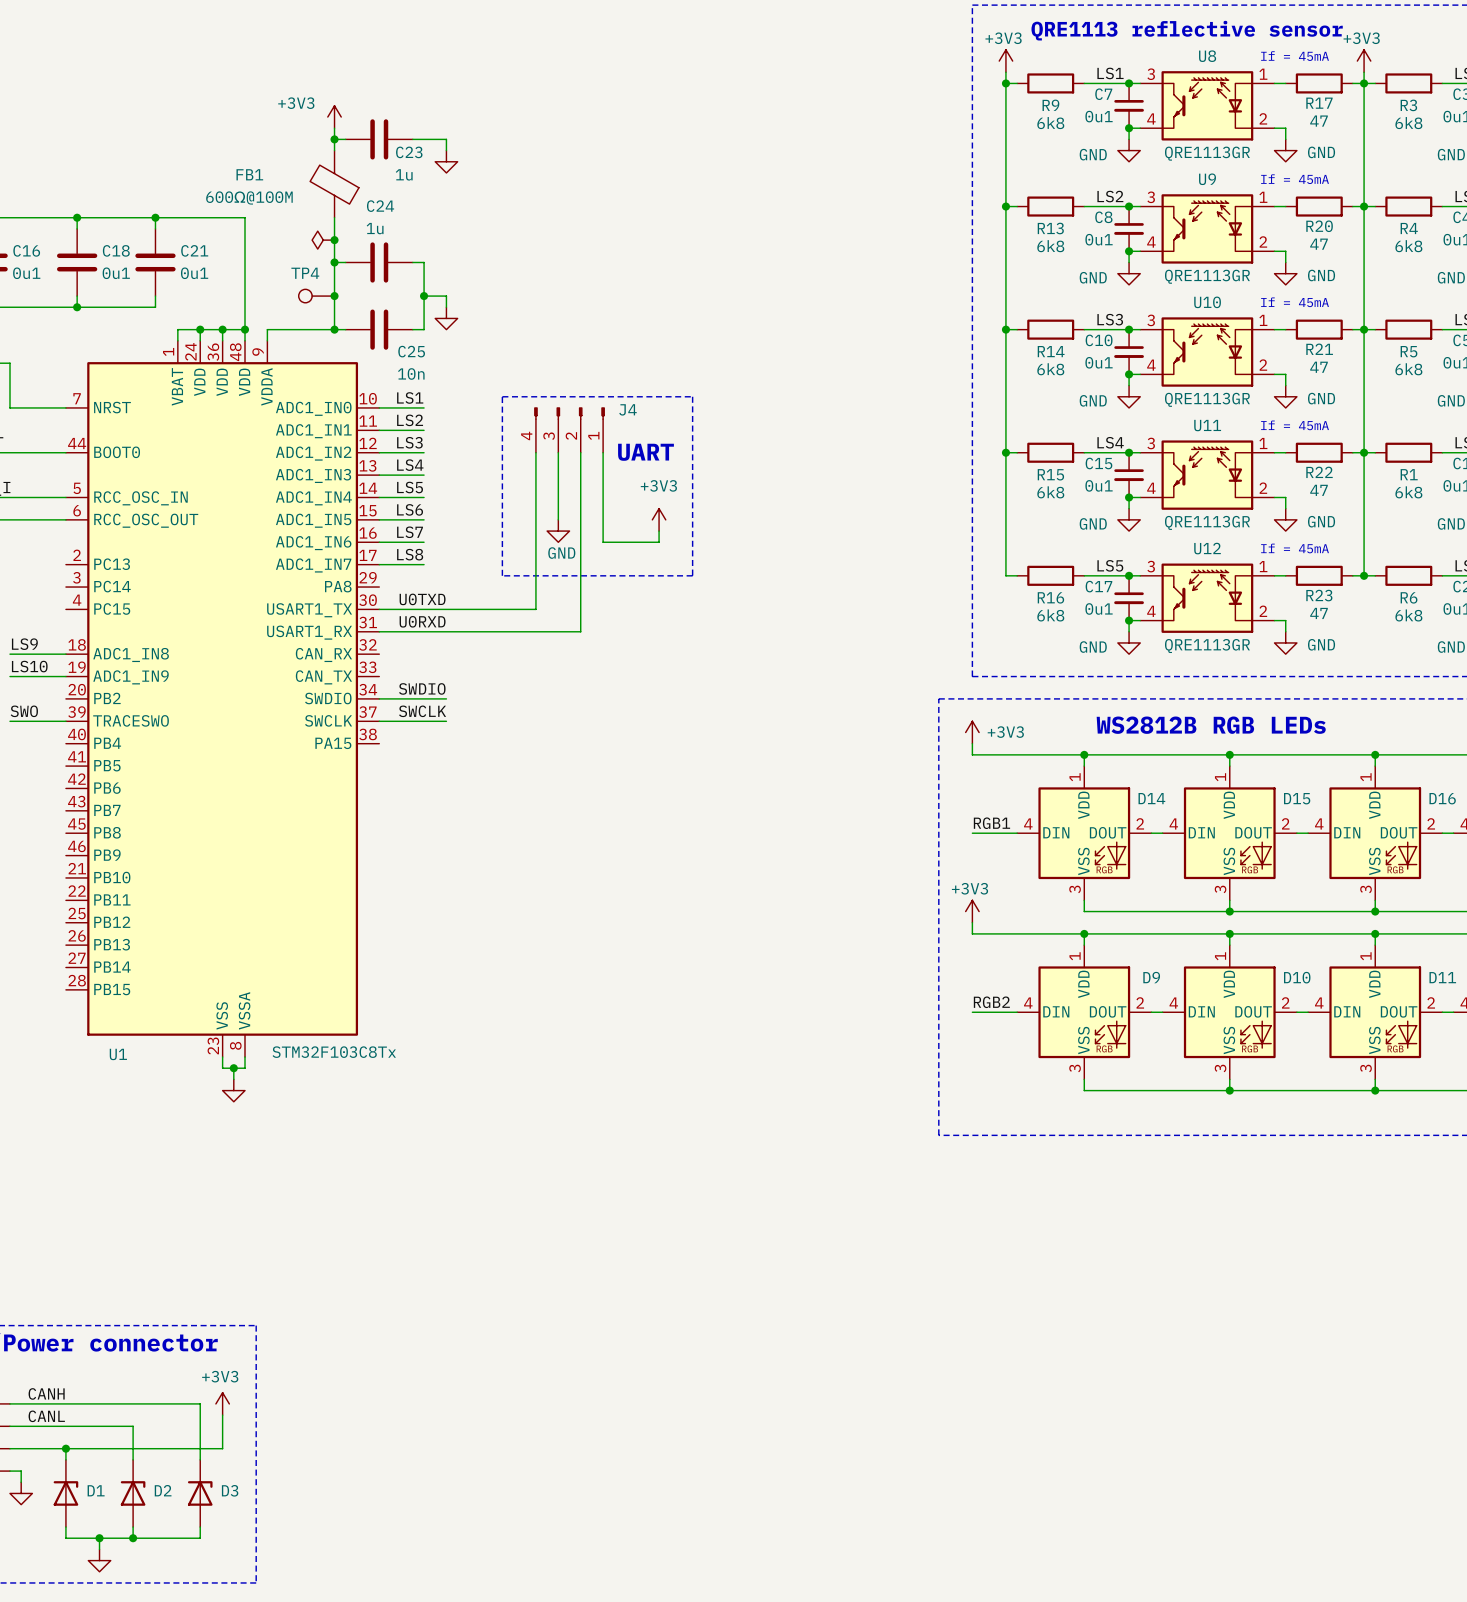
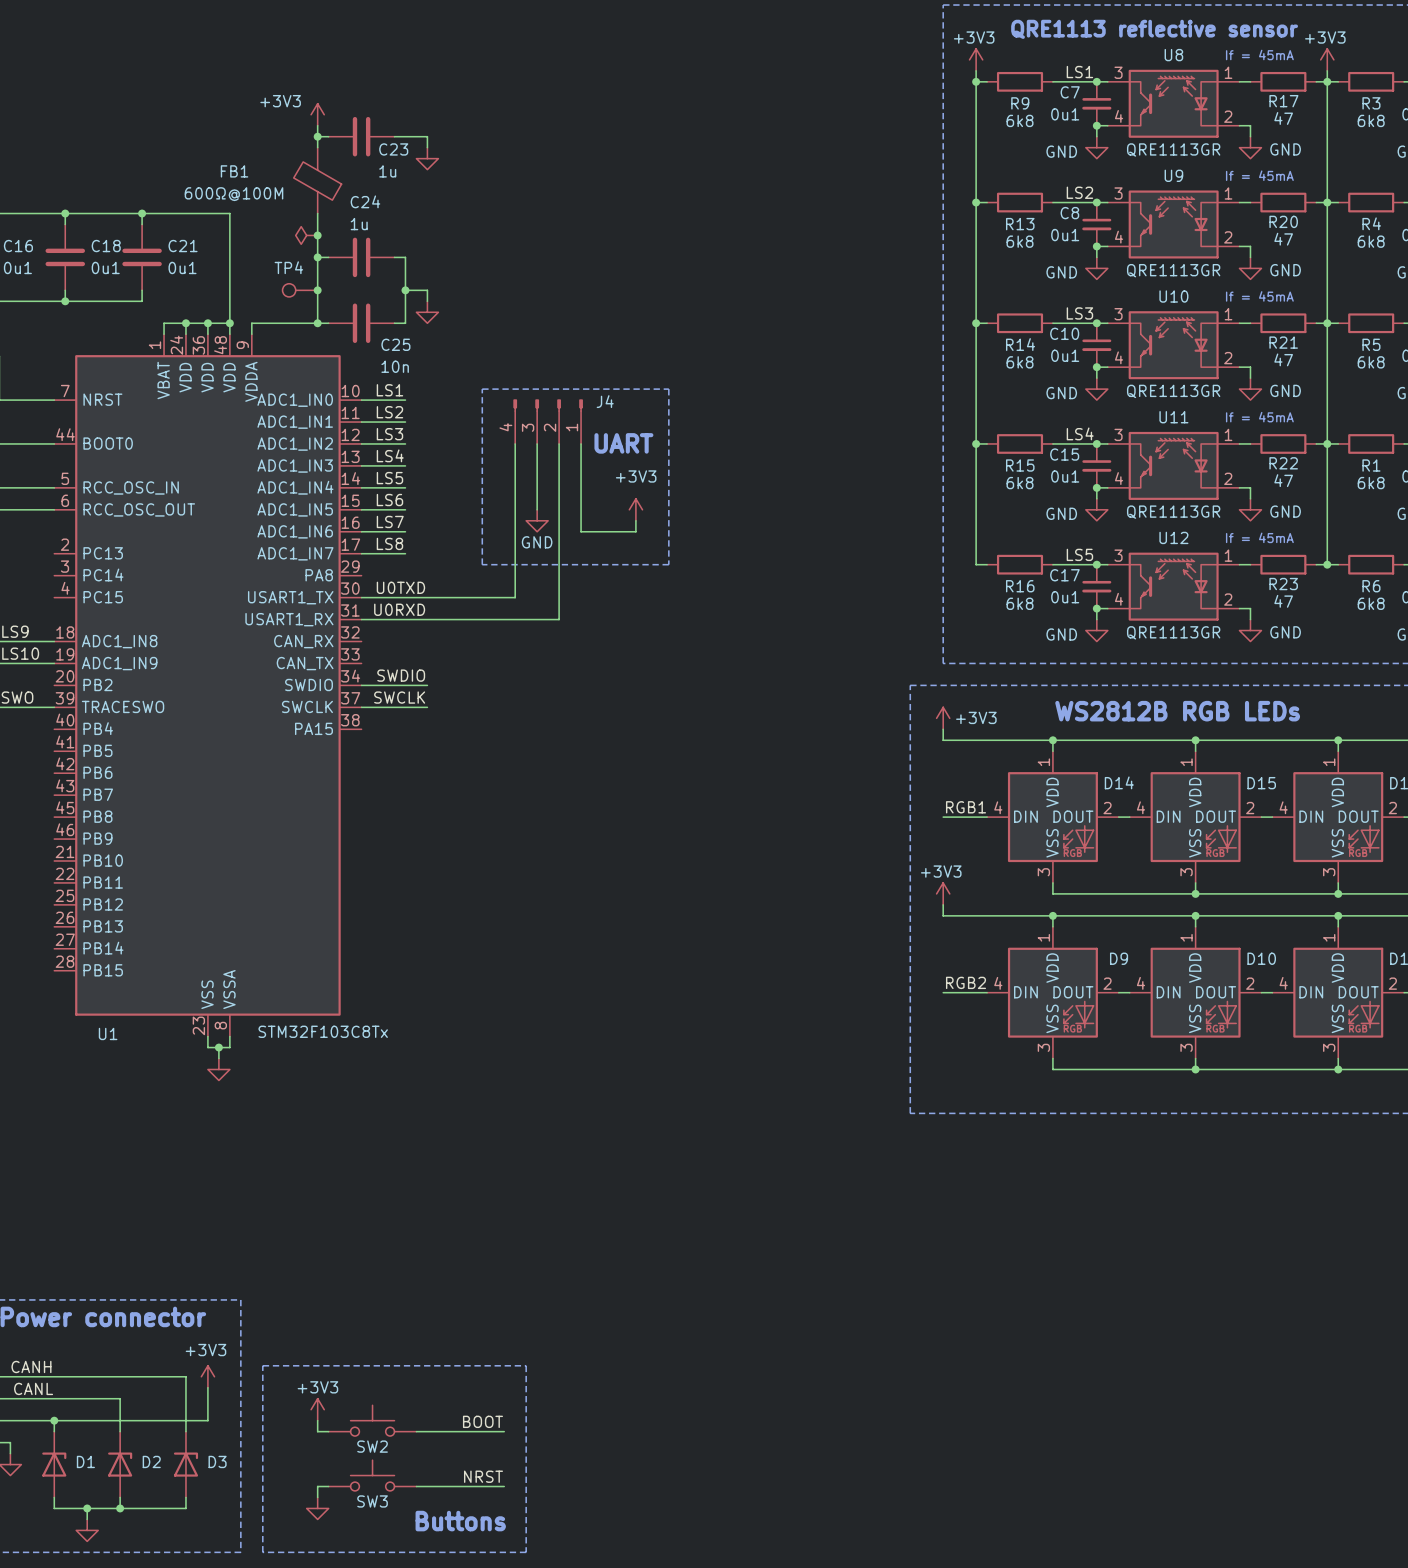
line: none -> (262, 1365) (526, 1365) (526, 1552) (262, 1552) (262, 1365)
power symbol: none -> +3V3 (317, 1409)
wire: none -> (317, 1420) (317, 1431) (328, 1431)
SW2: none -> (372, 1420)
label: none -> BOOT (482, 1421)
wire: none -> (416, 1431) (504, 1431)
SW3: none -> (372, 1475)
label: none -> NRST (483, 1476)
wire: none -> (328, 1486) (317, 1486) (317, 1497)
wire: none -> (416, 1486) (504, 1486)
power symbol: none -> (317, 1508)
text: none -> Buttons (460, 1521)

